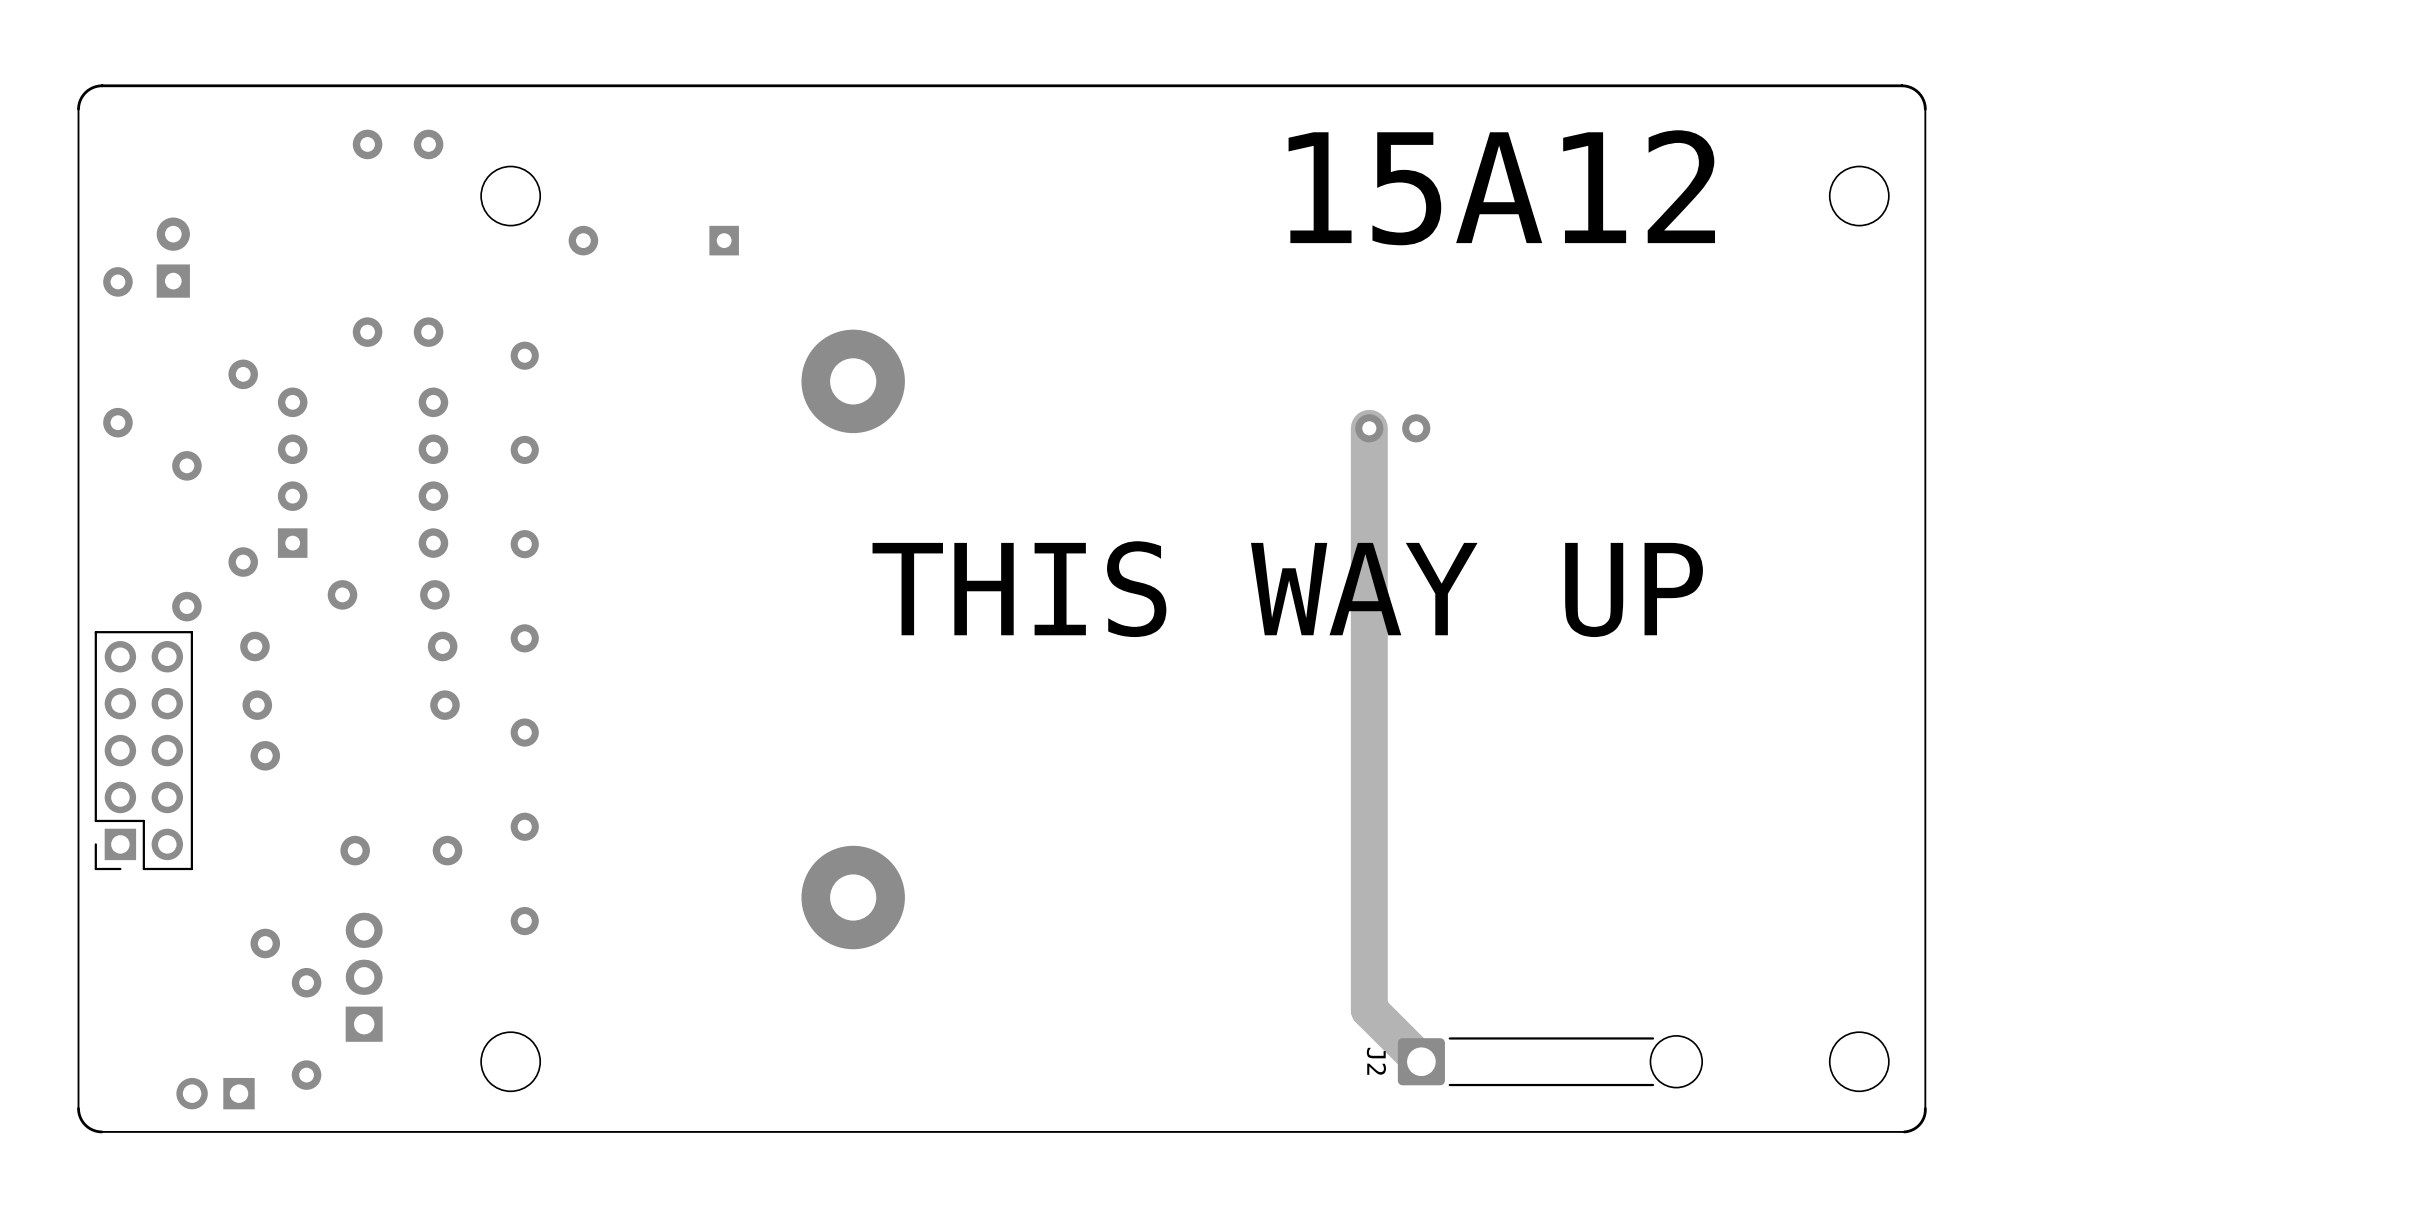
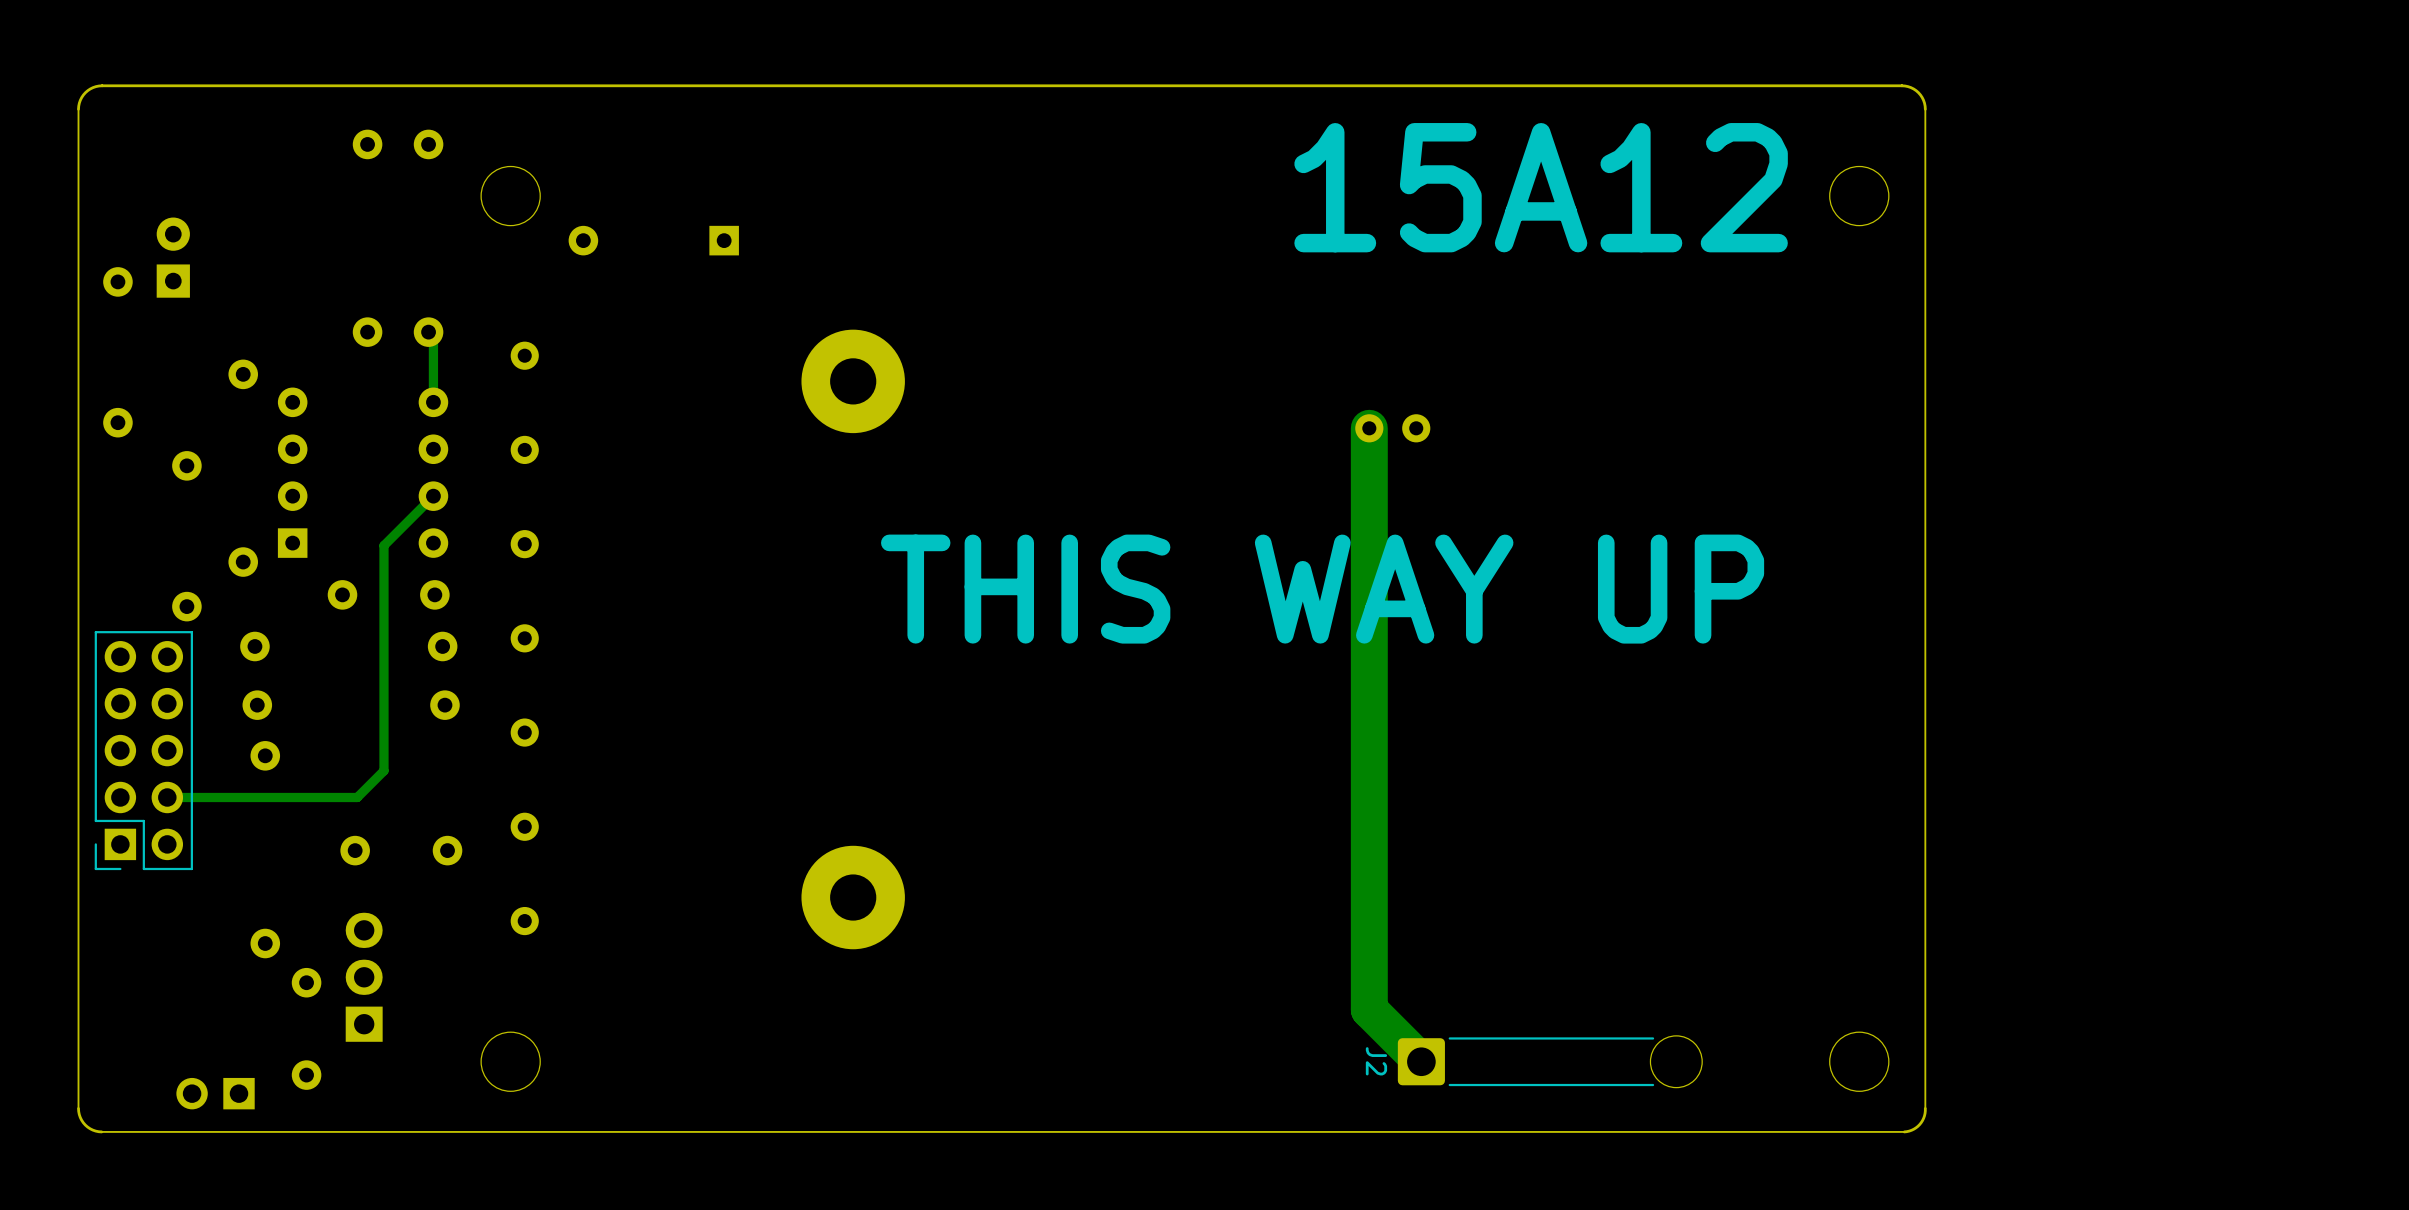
track: none -> (428, 332) (433, 337) (433, 402)
track: none -> (433, 496) (383, 545) (383, 770) (357, 797) (167, 797)

